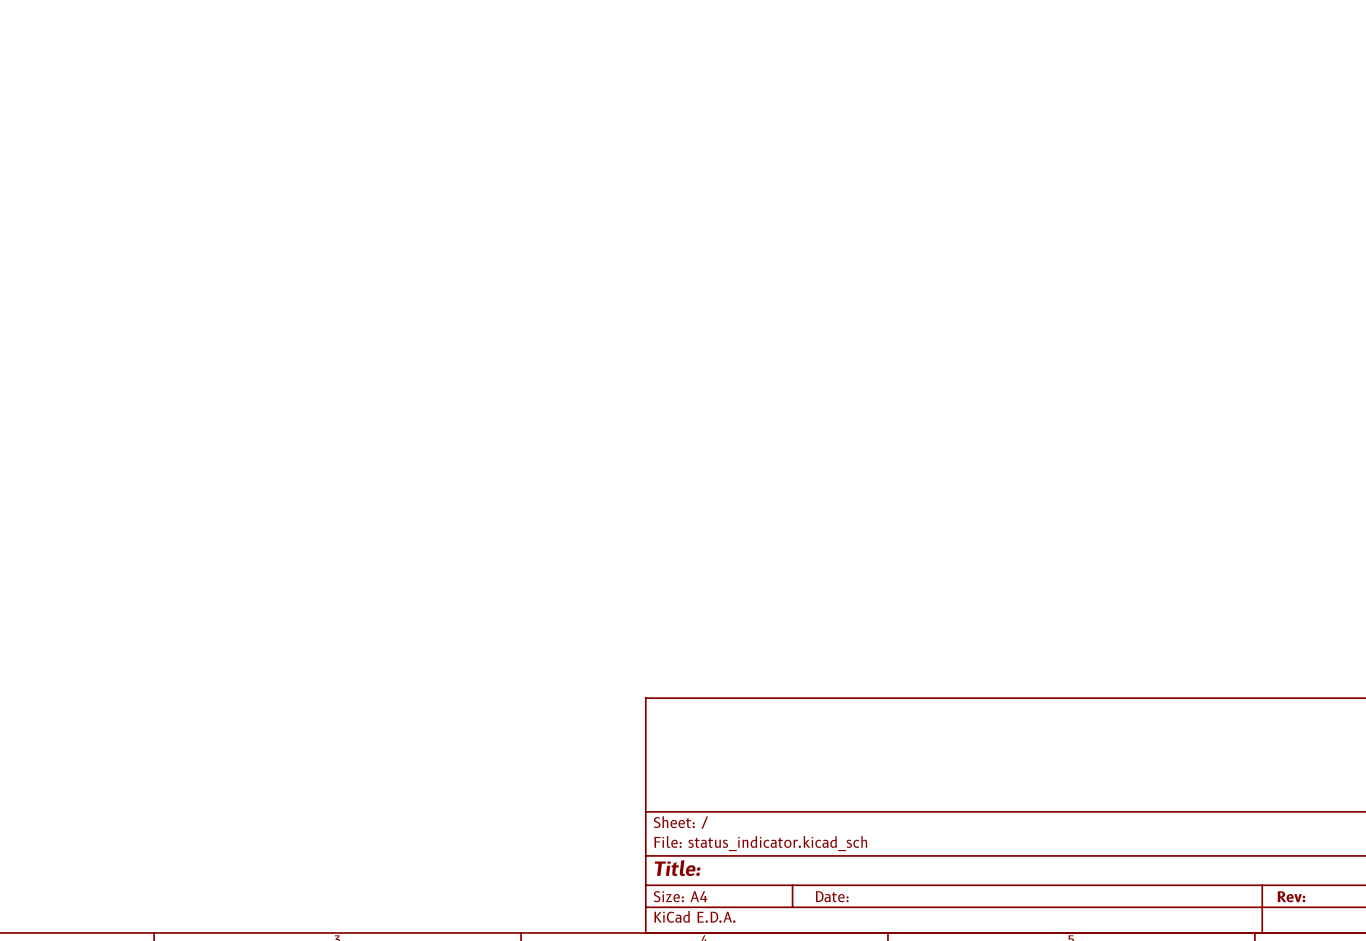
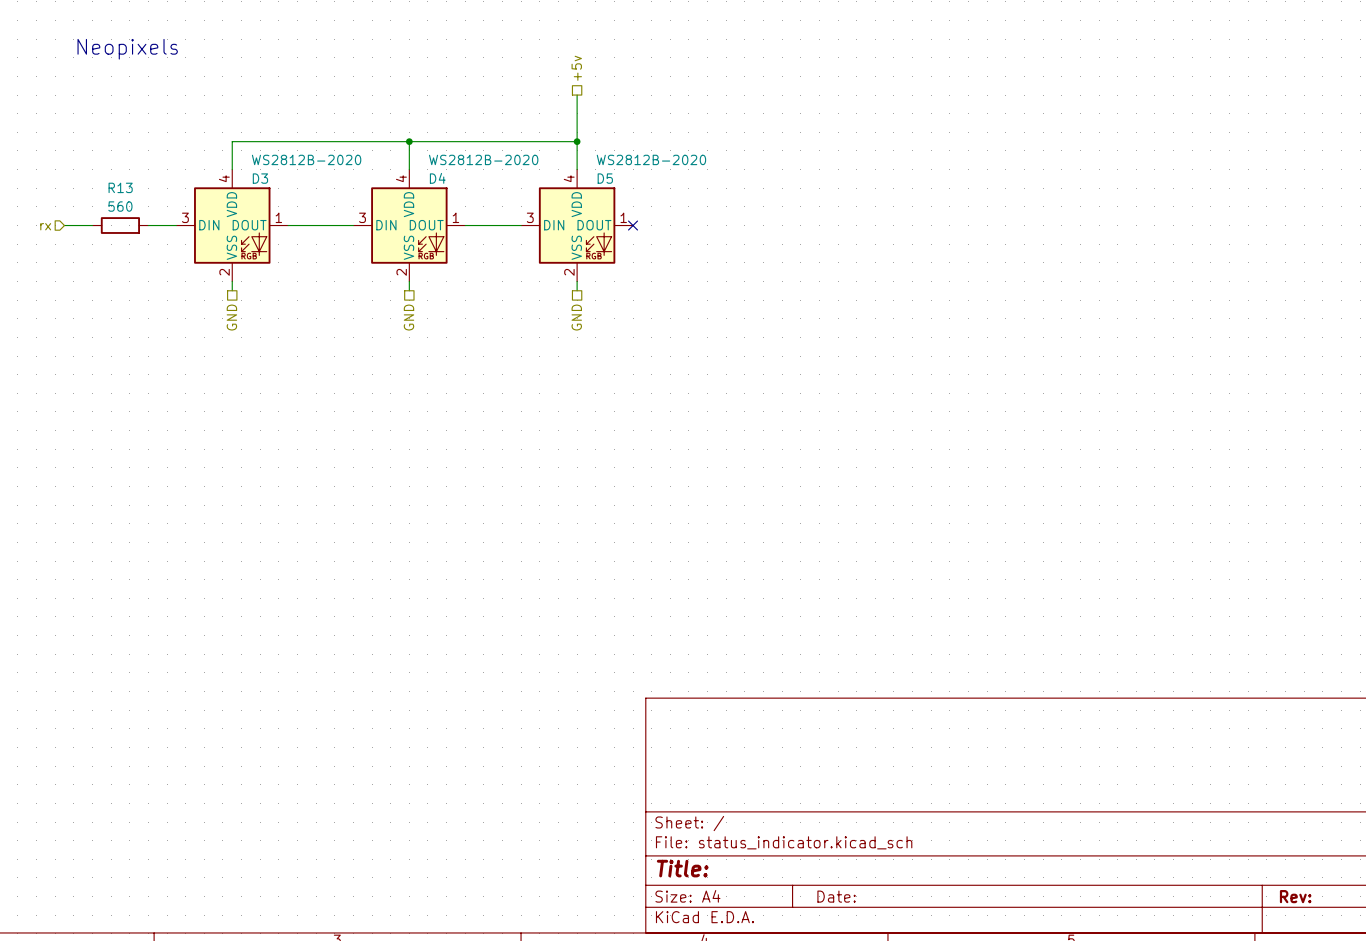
text: none -> Neopixels (127, 49)
hierarchical label: none -> +5v (576, 68)
wire: none -> (577, 95) (577, 169)
wire: none -> (409, 141) (409, 169)
junction: none -> (409, 141)
wire: none -> (577, 141) (232, 141) (232, 169)
junction: none -> (577, 141)
wire: none -> (64, 225) (92, 225)
R13: none -> 560 (120, 225)
wire: none -> (148, 225) (176, 225)
D3: none -> WS2812B-2020 (232, 225)
wire: none -> (288, 225) (353, 225)
D4: none -> WS2812B-2020 (409, 225)
wire: none -> (465, 225) (521, 225)
D5: none -> WS2812B-2020 (577, 225)
no-connect mark: none -> (633, 225)
hierarchical label: none -> rx (45, 226)
wire: none -> (232, 281) (232, 290)
wire: none -> (409, 281) (409, 290)
wire: none -> (577, 281) (577, 290)
hierarchical label: none -> GND (231, 317)
hierarchical label: none -> GND (408, 317)
hierarchical label: none -> GND (576, 317)

